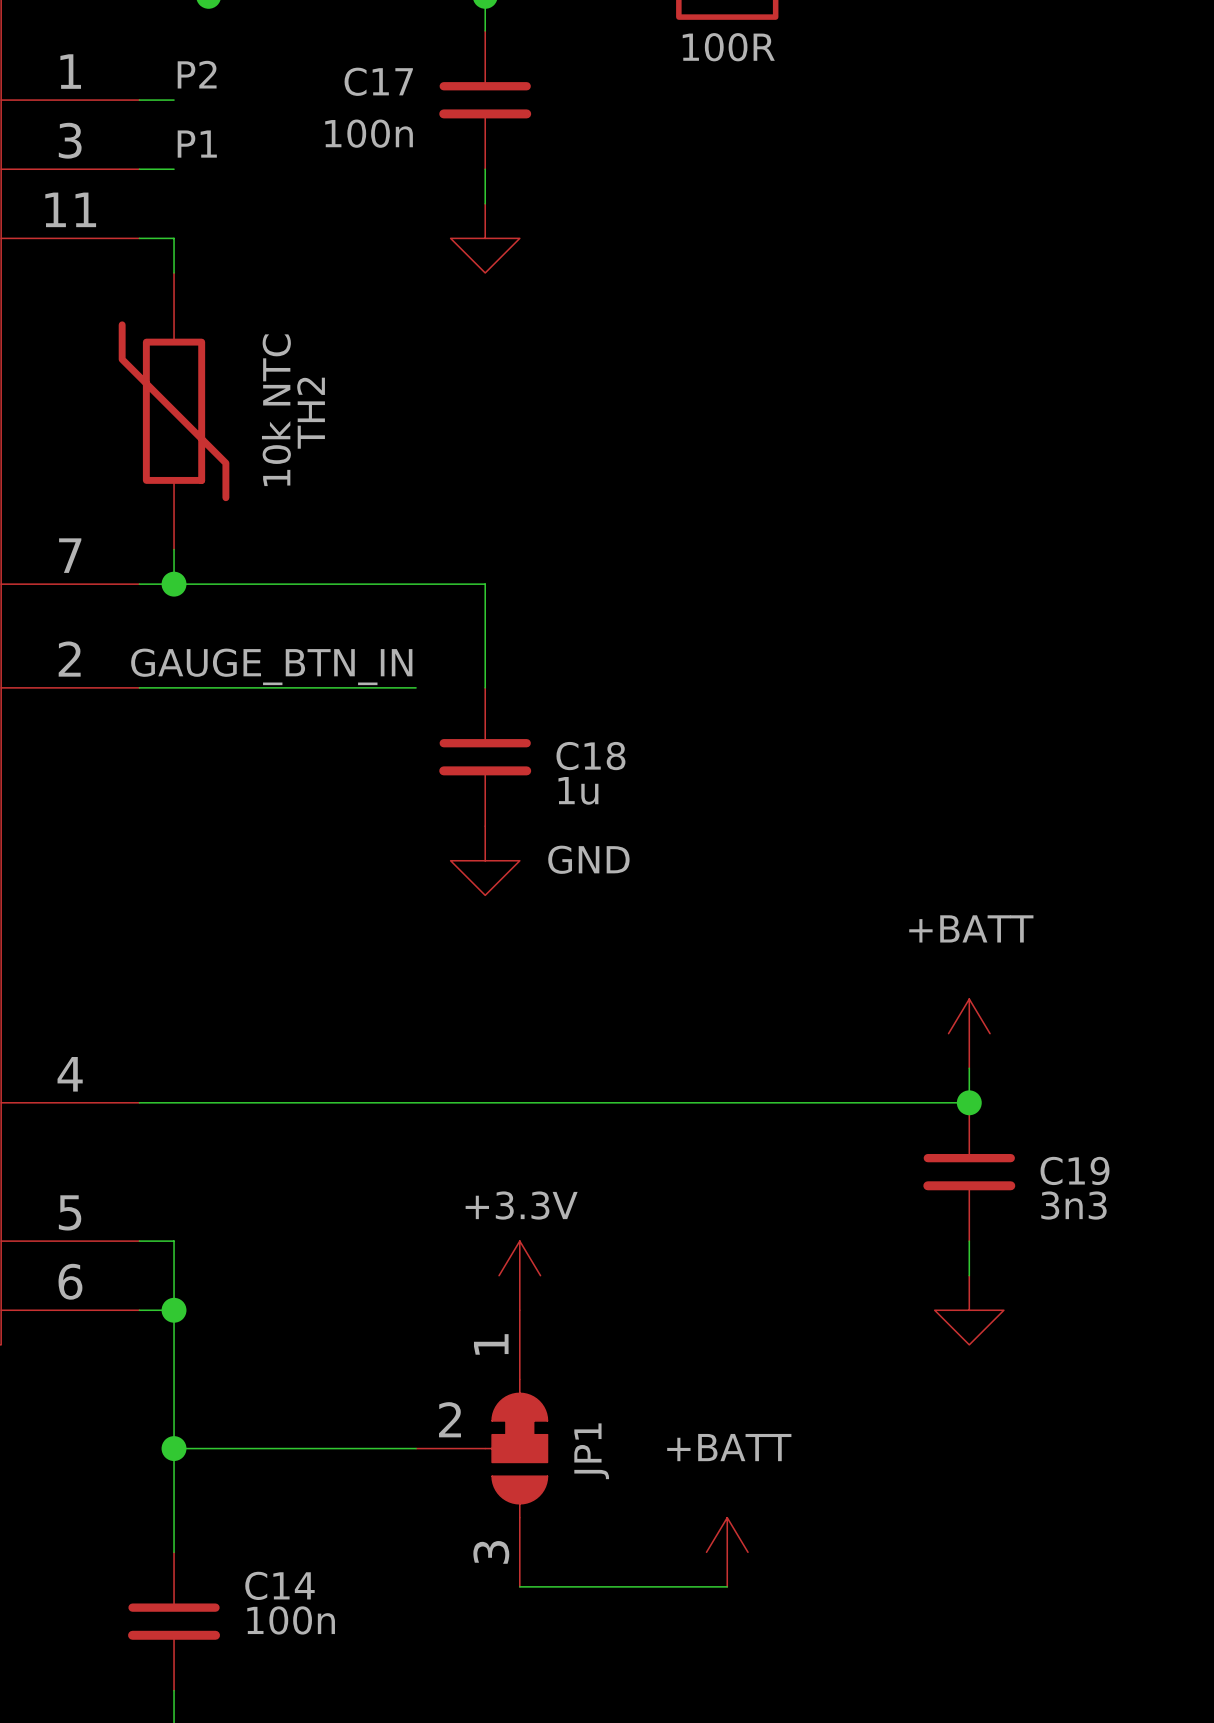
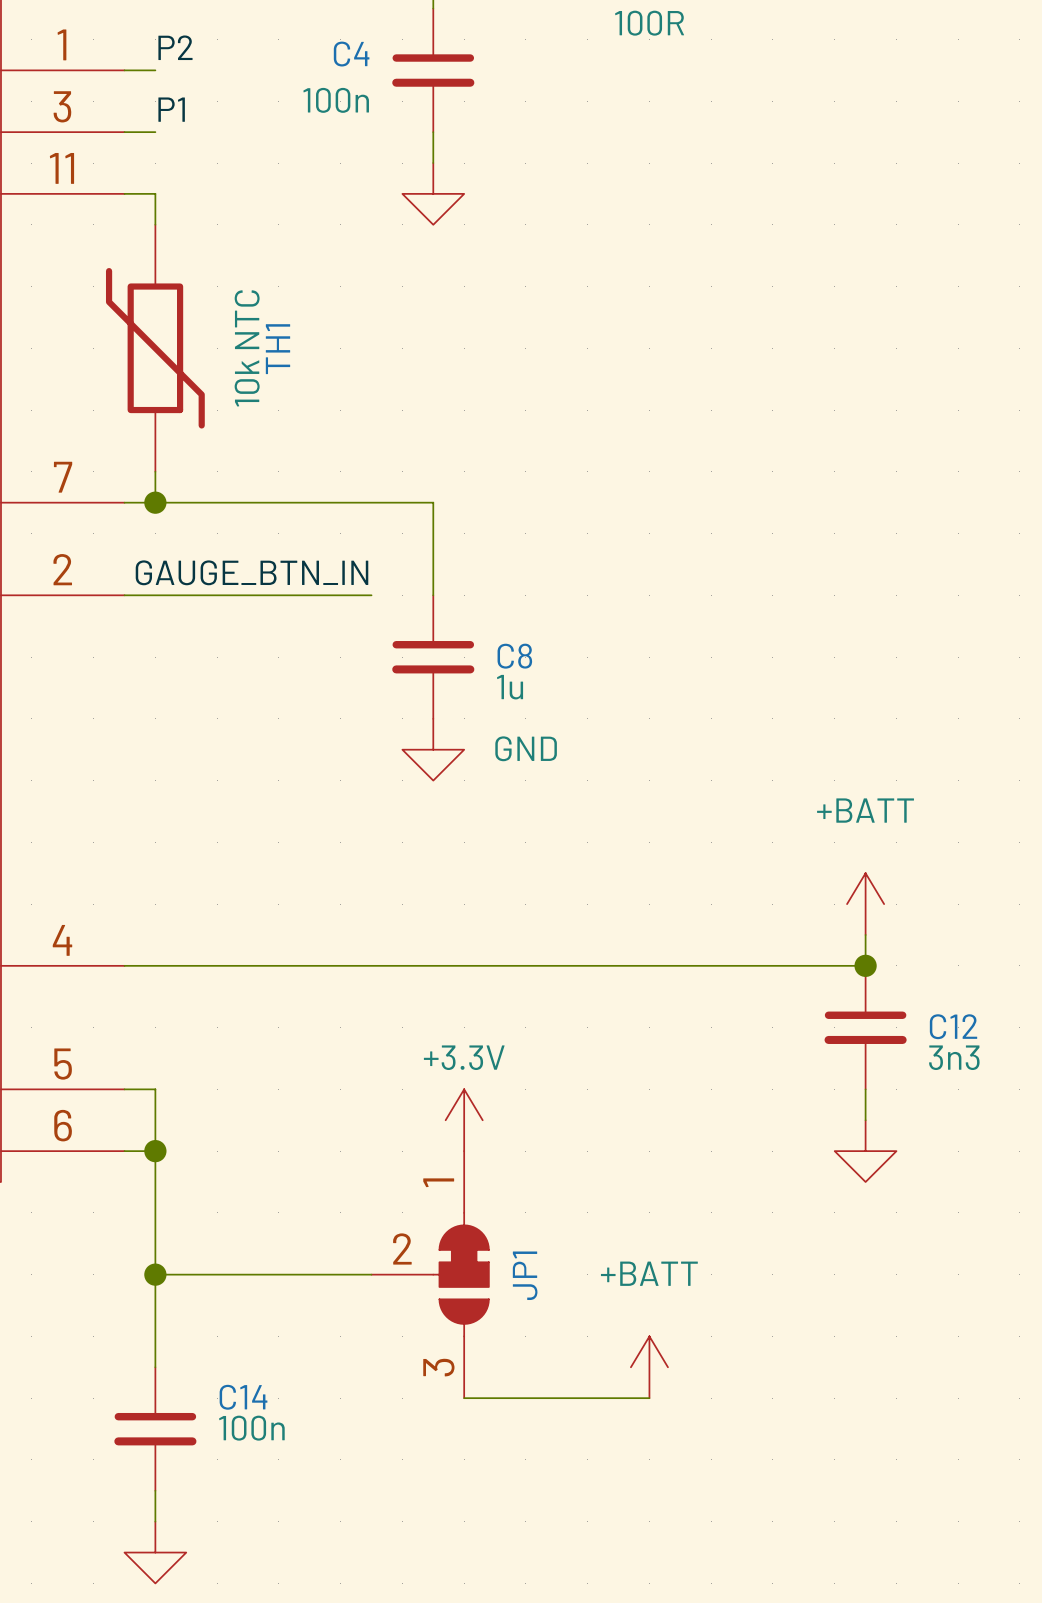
C17 name: C17 (378, 81) -> C4 (351, 54)
TH2 name: TH2 (311, 413) -> TH1 (277, 349)
C18 name: C18 (590, 756) -> C8 (514, 656)
C19 name: C19 (1074, 1170) -> C12 (953, 1026)

